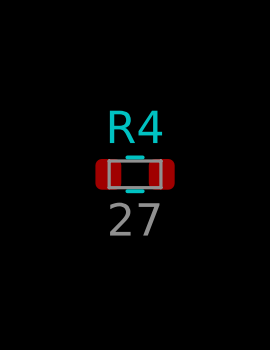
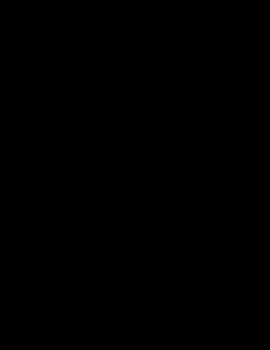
R4: 27 (135, 174) -> none

